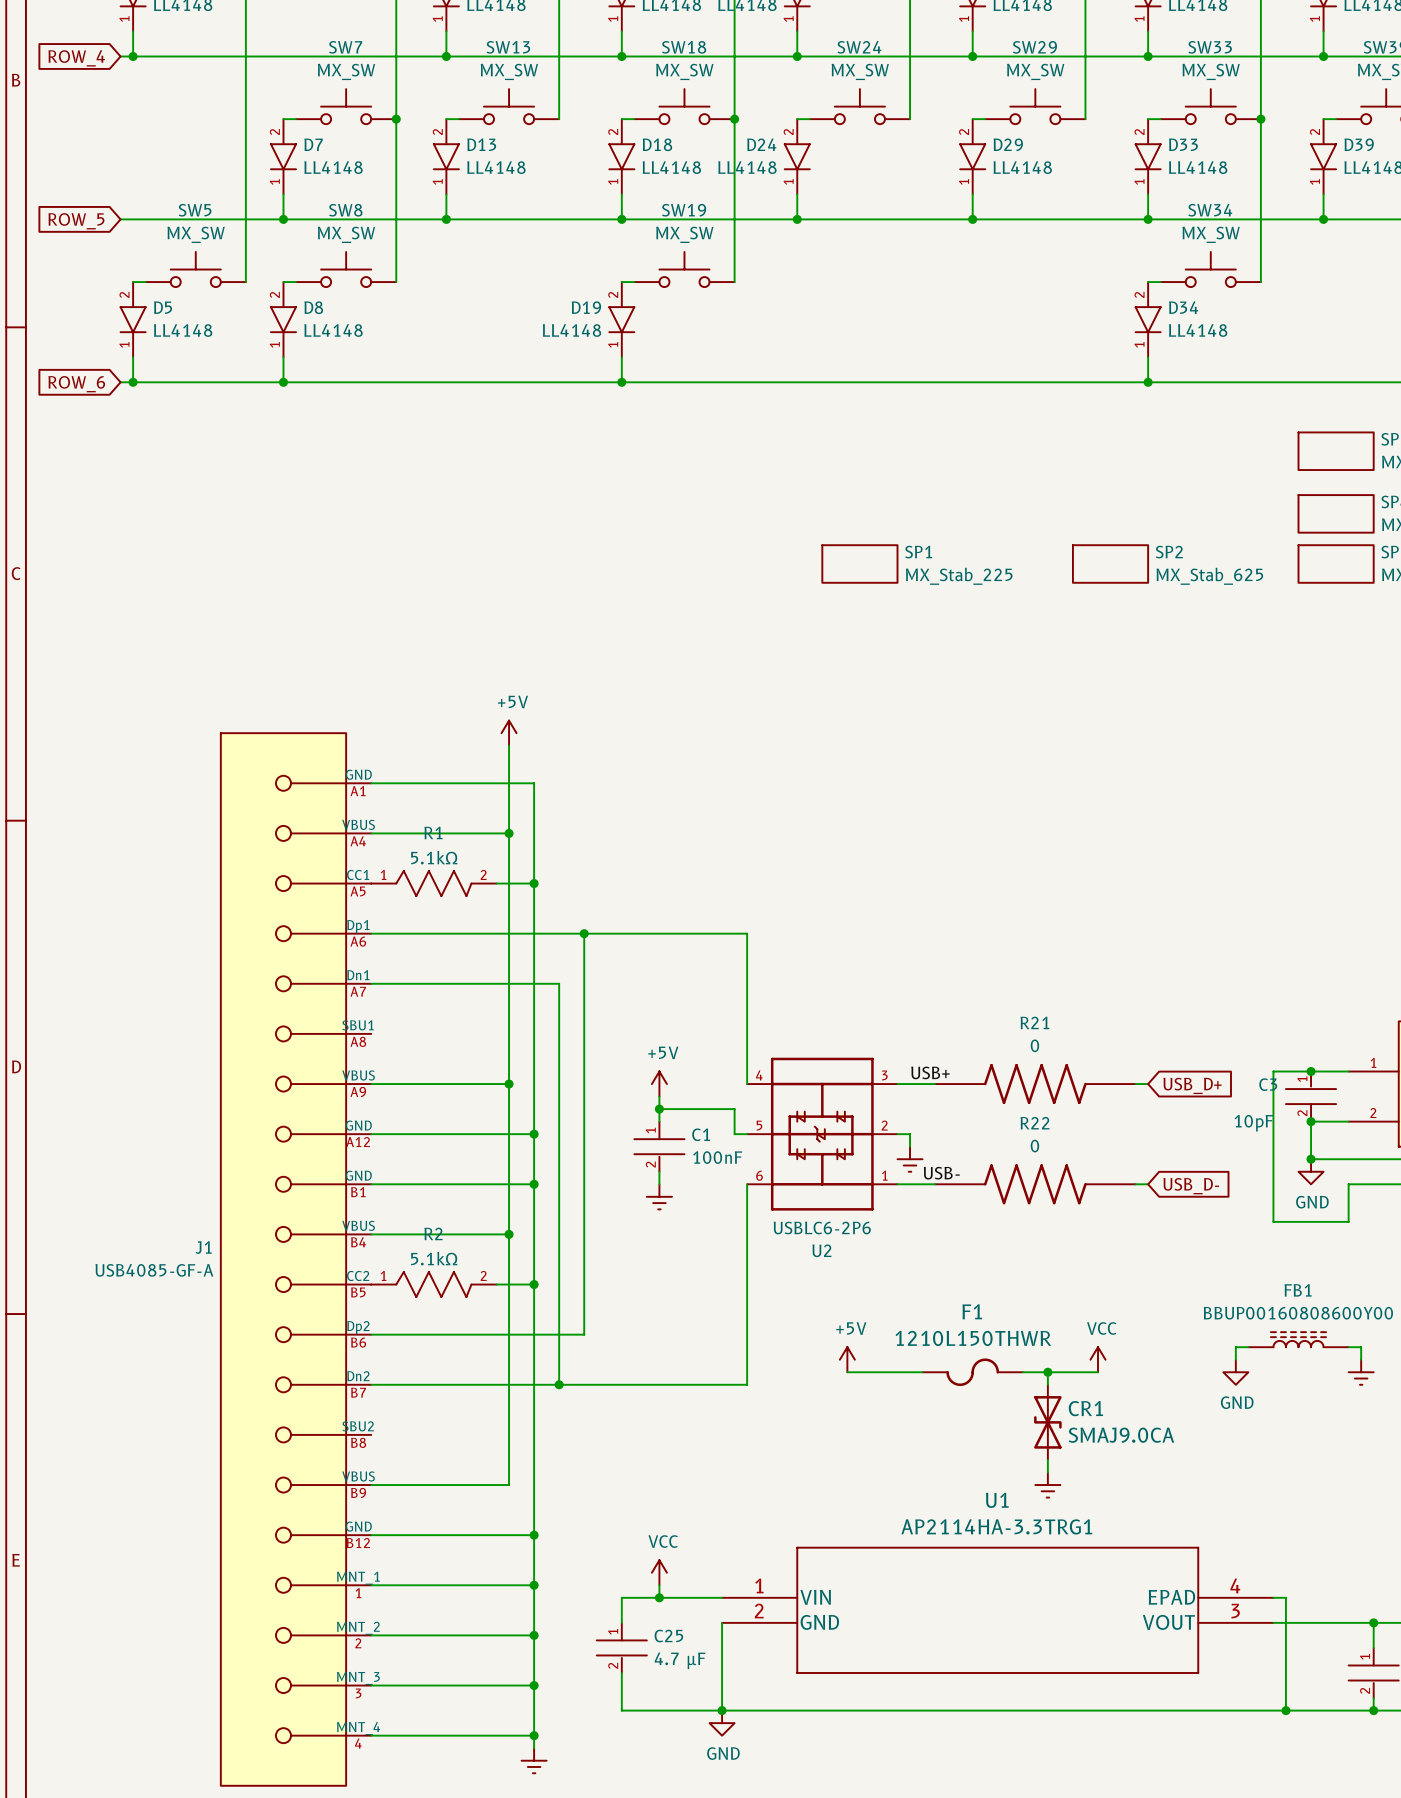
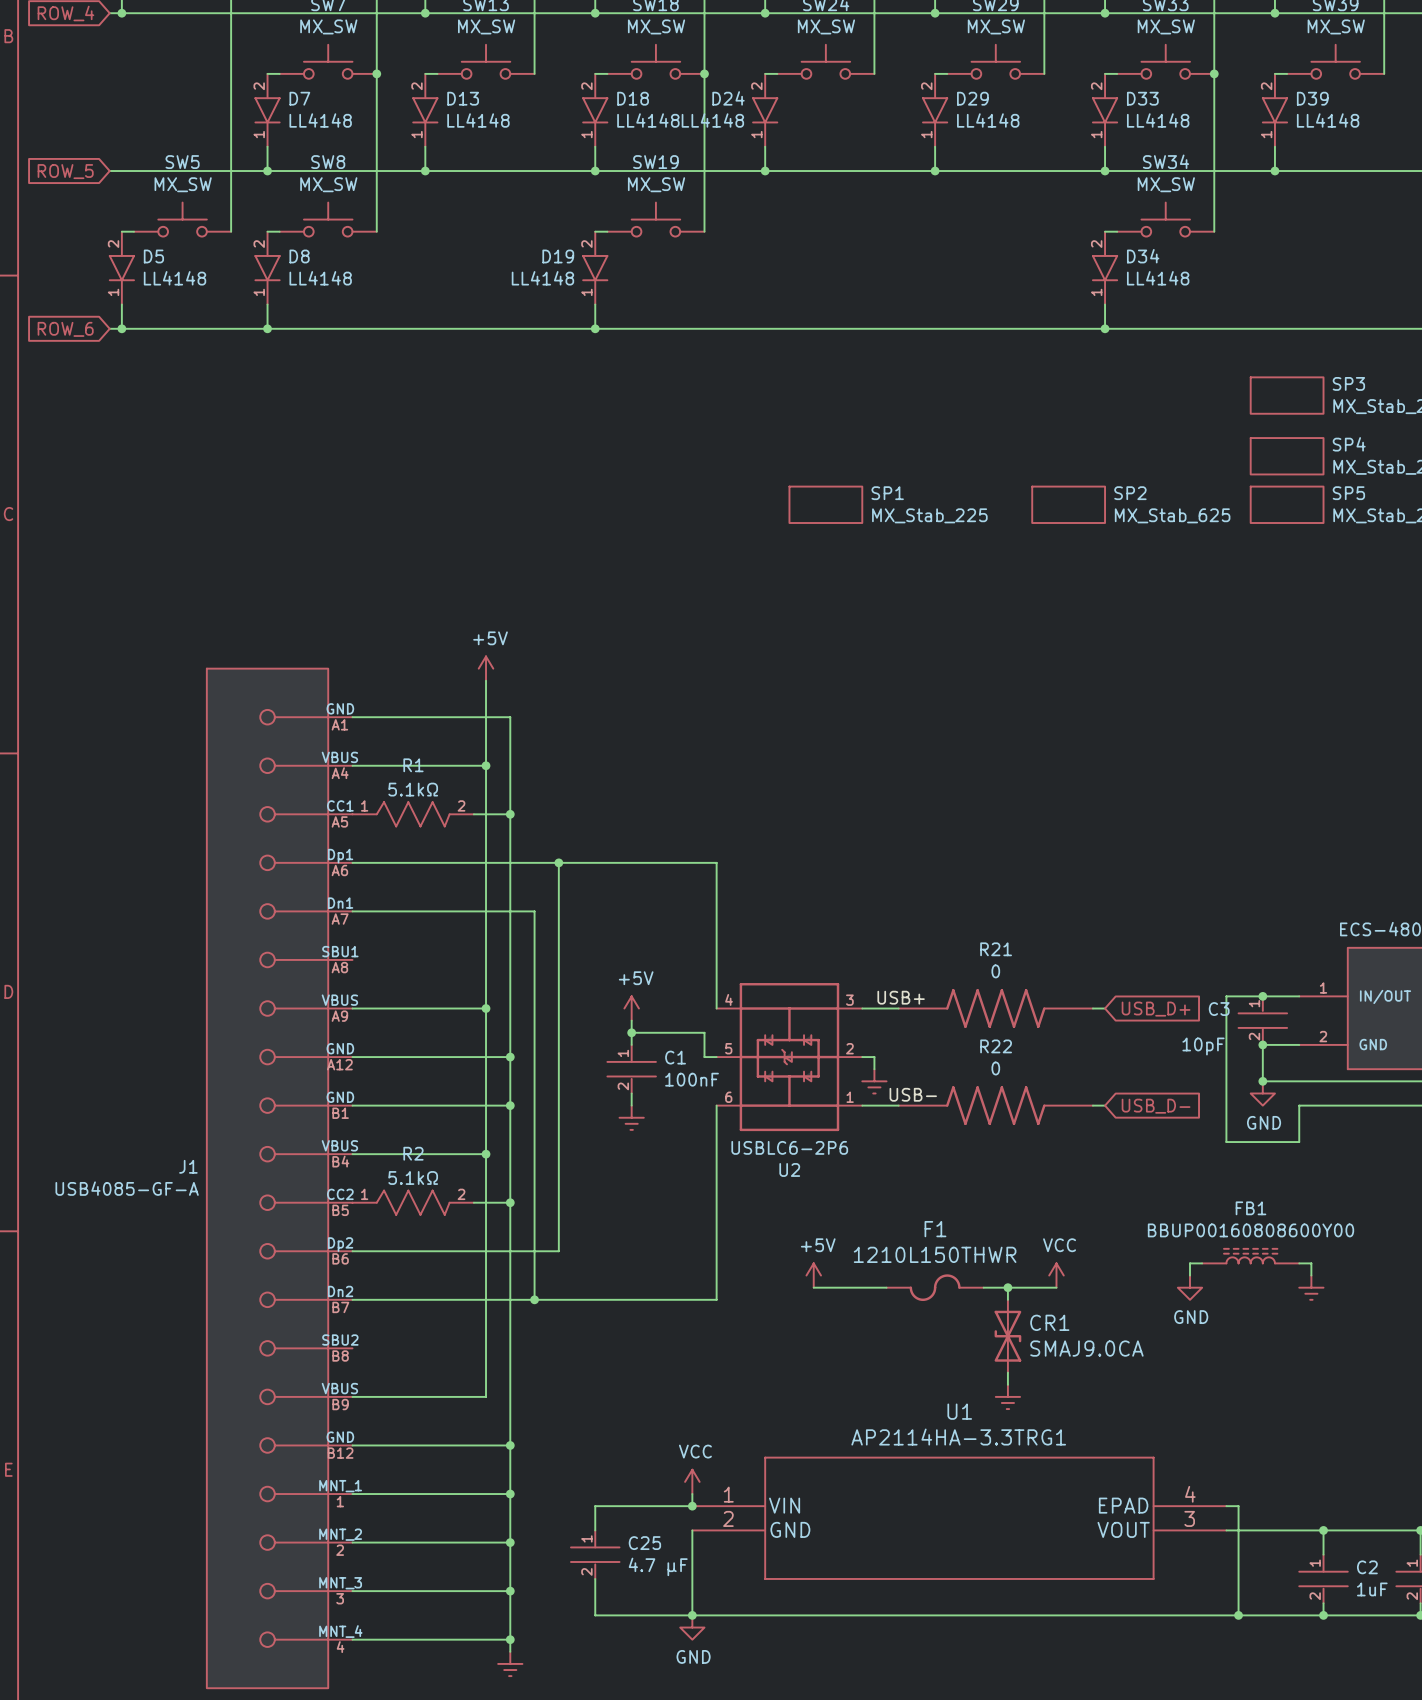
power symbol position: VCC (659, 1572) -> VCC (692, 1481)
wire: (659, 1585) (659, 1597) -> (692, 1494) (692, 1506)
junction: (659, 1597) -> none
junction: none -> (692, 1506)

